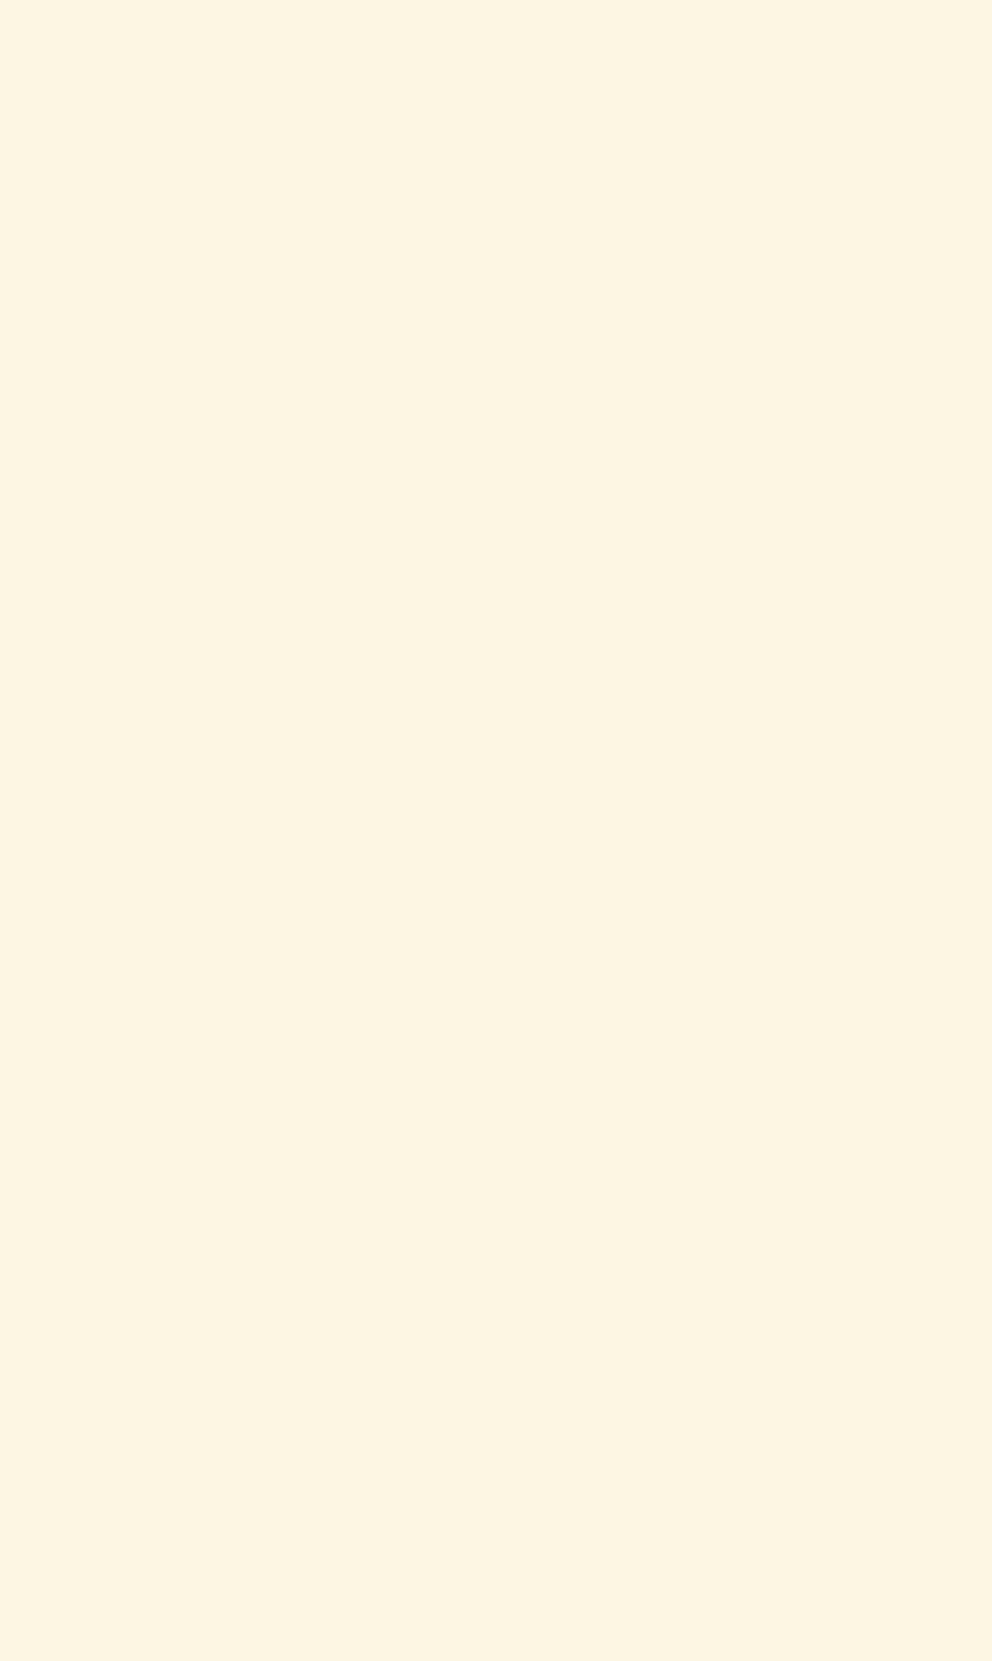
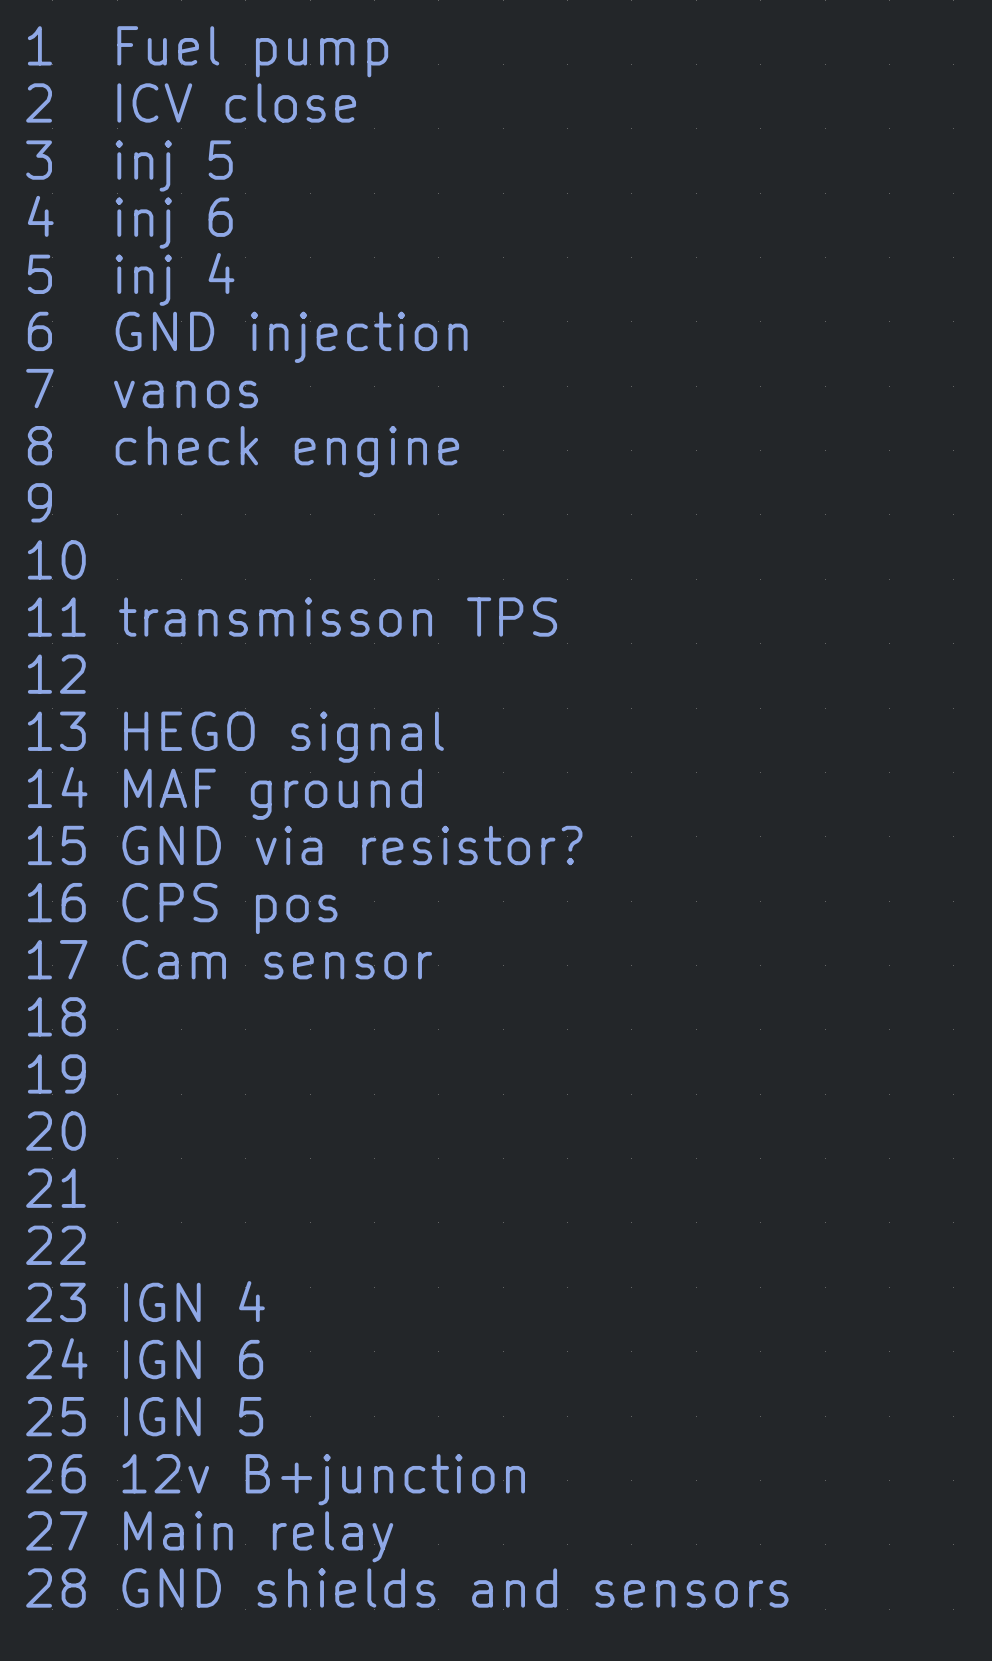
text: none -> 1 Fuel pump (208, 51)
text: none -> 2 ICV close (191, 102)
text: none -> 3 inj 5 (129, 165)
text: none -> 4 inj 6 (130, 222)
text: none -> 5 inj 4 (131, 279)
text: none -> 6 GND injection (247, 337)
text: none -> 7 vanos (142, 388)
text: none -> 8 check engine (243, 451)
text: none -> 9 (39, 502)
text: none -> 10 (56, 559)
text: none -> 11 transmisson TPS (292, 617)
text: none -> 12 (56, 674)
text: none -> 13 HEGO signal (235, 737)
text: none -> 14 MAF ground (224, 793)
text: none -> 15 GND via resistor? (305, 845)
text: none -> 16 CPS pos (182, 908)
text: none -> 17 Cam sensor (229, 959)
text: none -> 18 (56, 1016)
text: none -> 19 (56, 1073)
text: none -> 20 (55, 1131)
text: none -> 21 (55, 1188)
text: none -> 22 (55, 1245)
text: none -> 23 IGN 4 (145, 1301)
text: none -> 24 IGN 6 (144, 1358)
text: none -> 25 IGN 5 (144, 1416)
text: none -> 26 12v B+junction (275, 1479)
text: none -> 27 Main relay (209, 1536)
text: none -> 28 GND shields and sensors (407, 1587)

